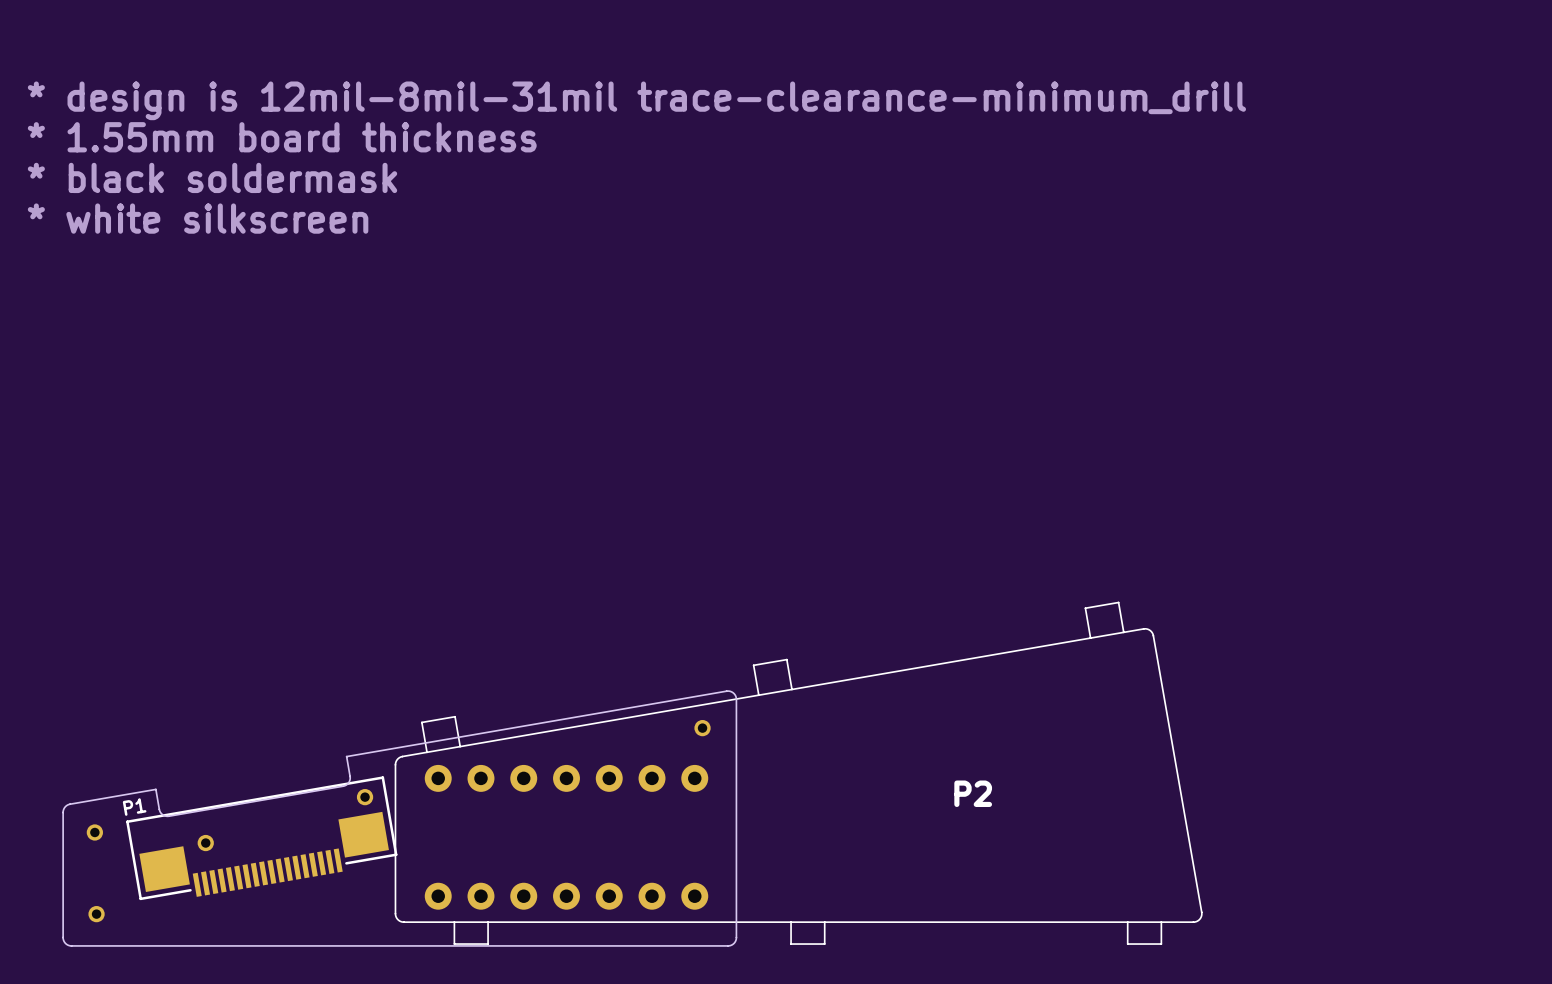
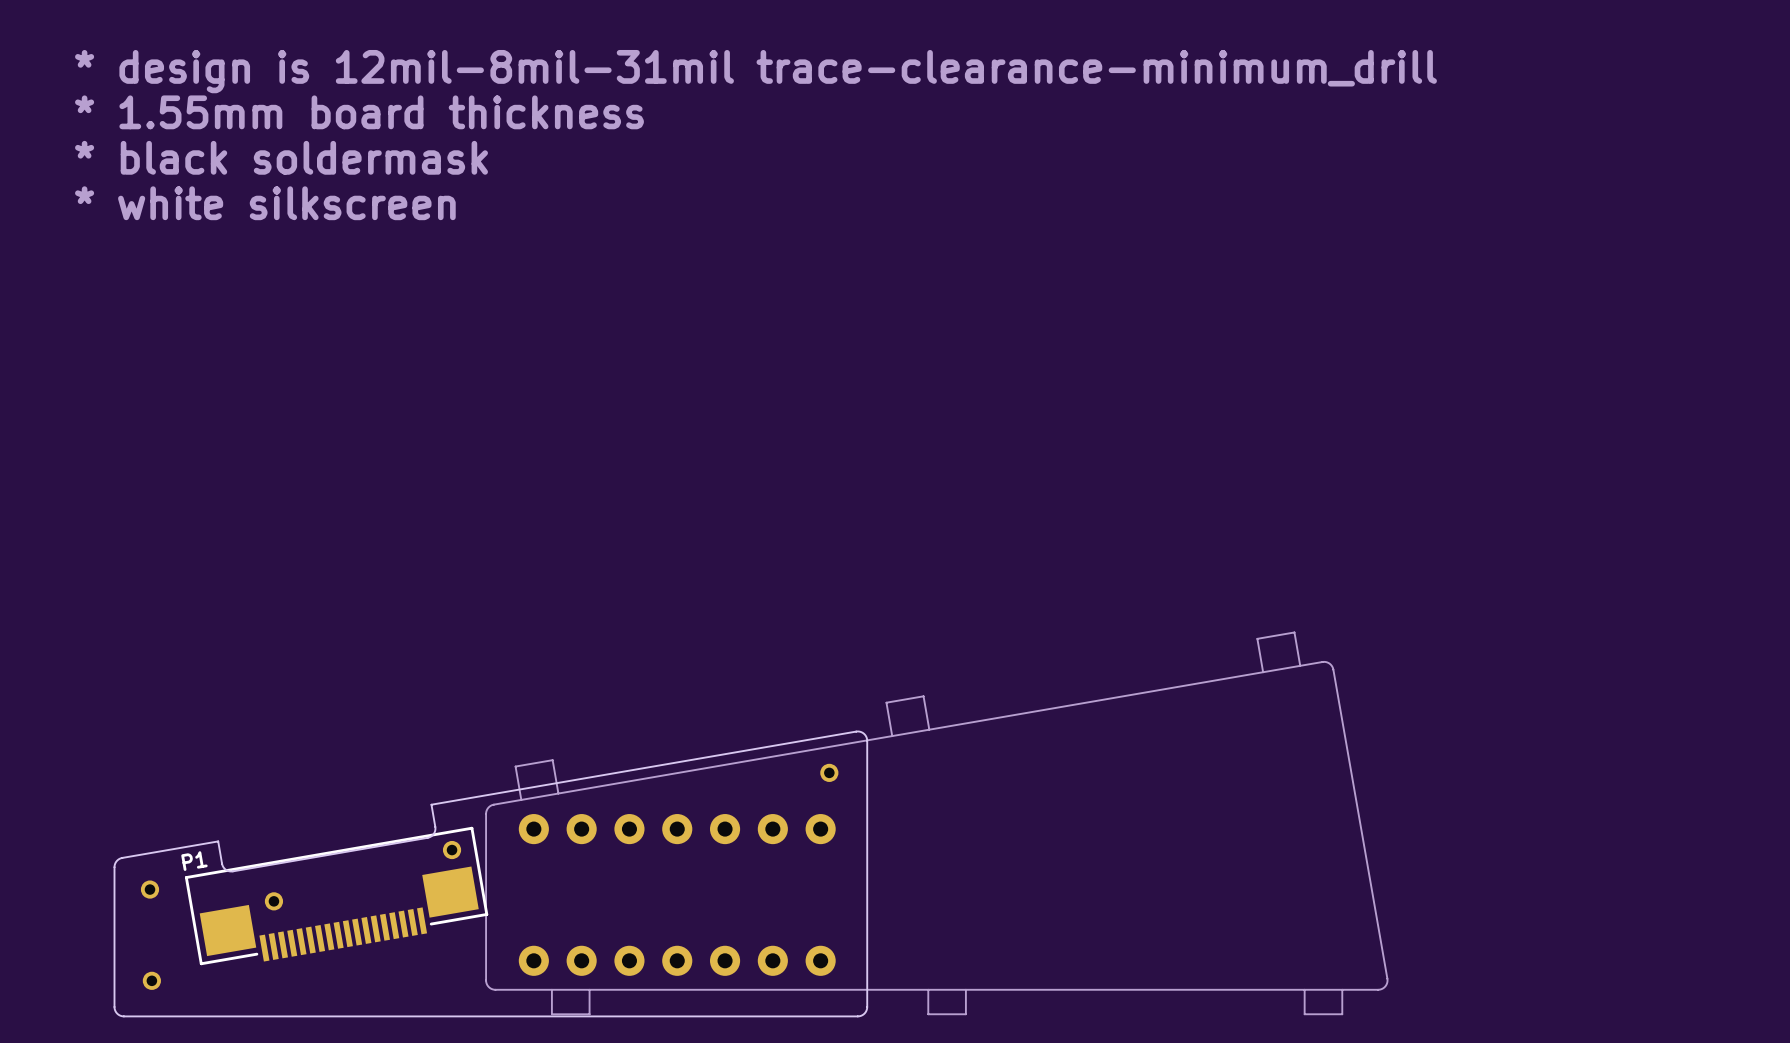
P2: (798, 773) -> none
part: none -> (936, 823)

